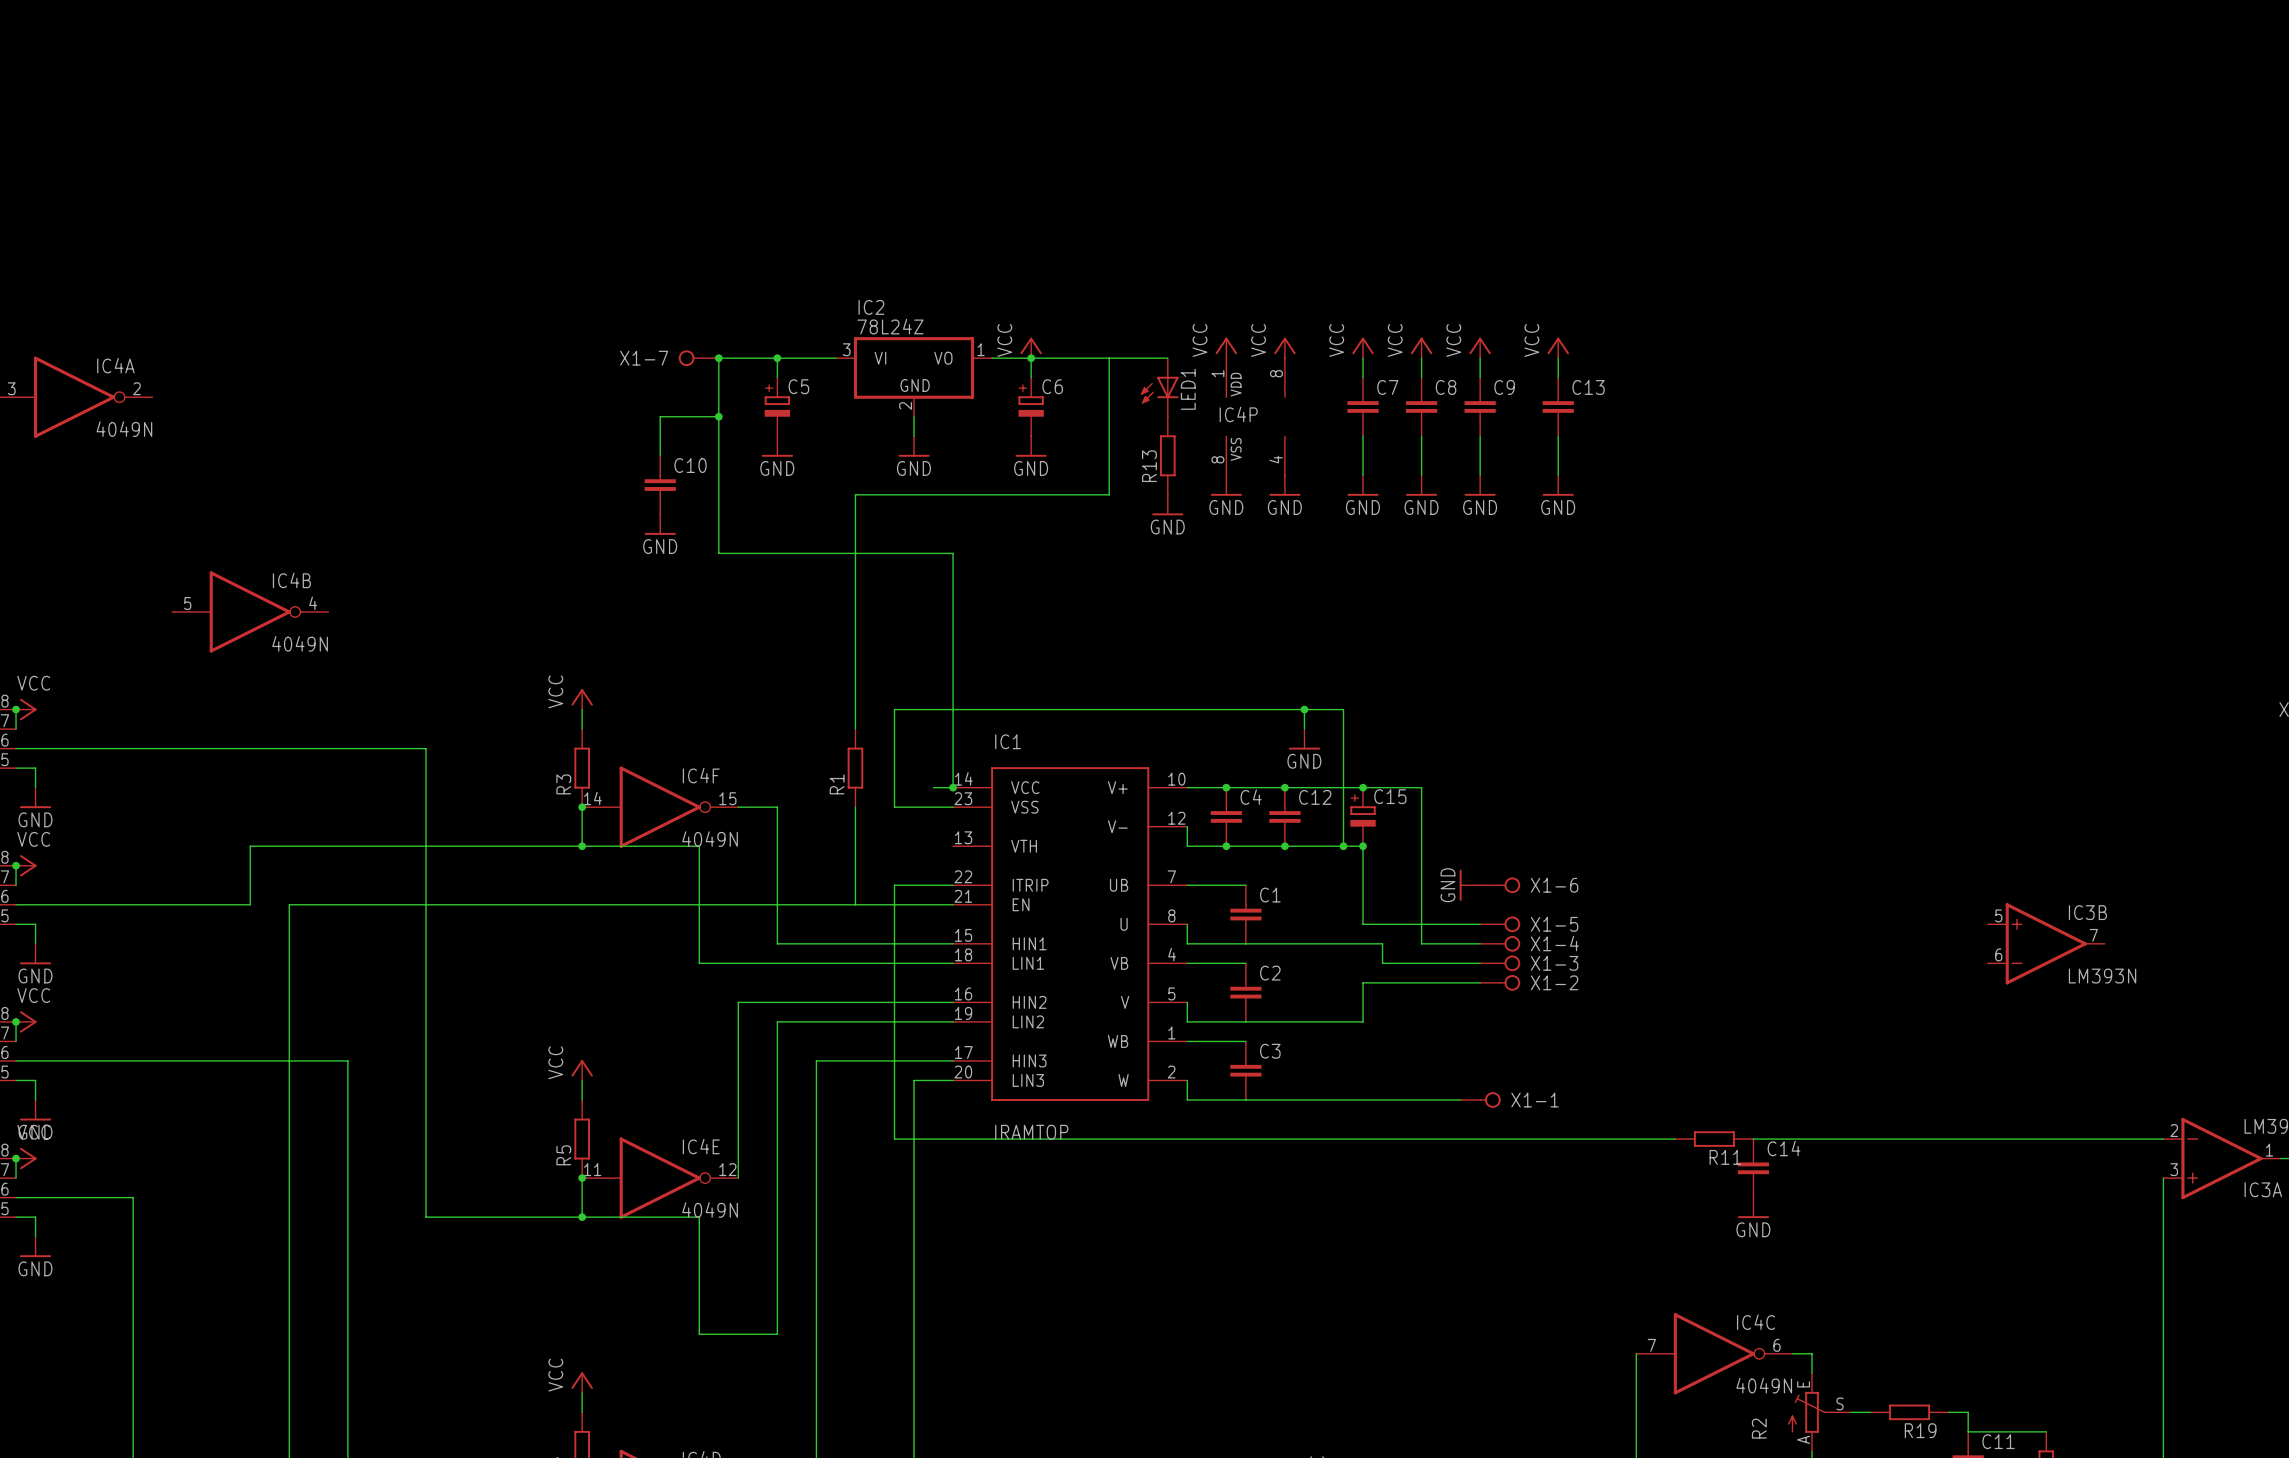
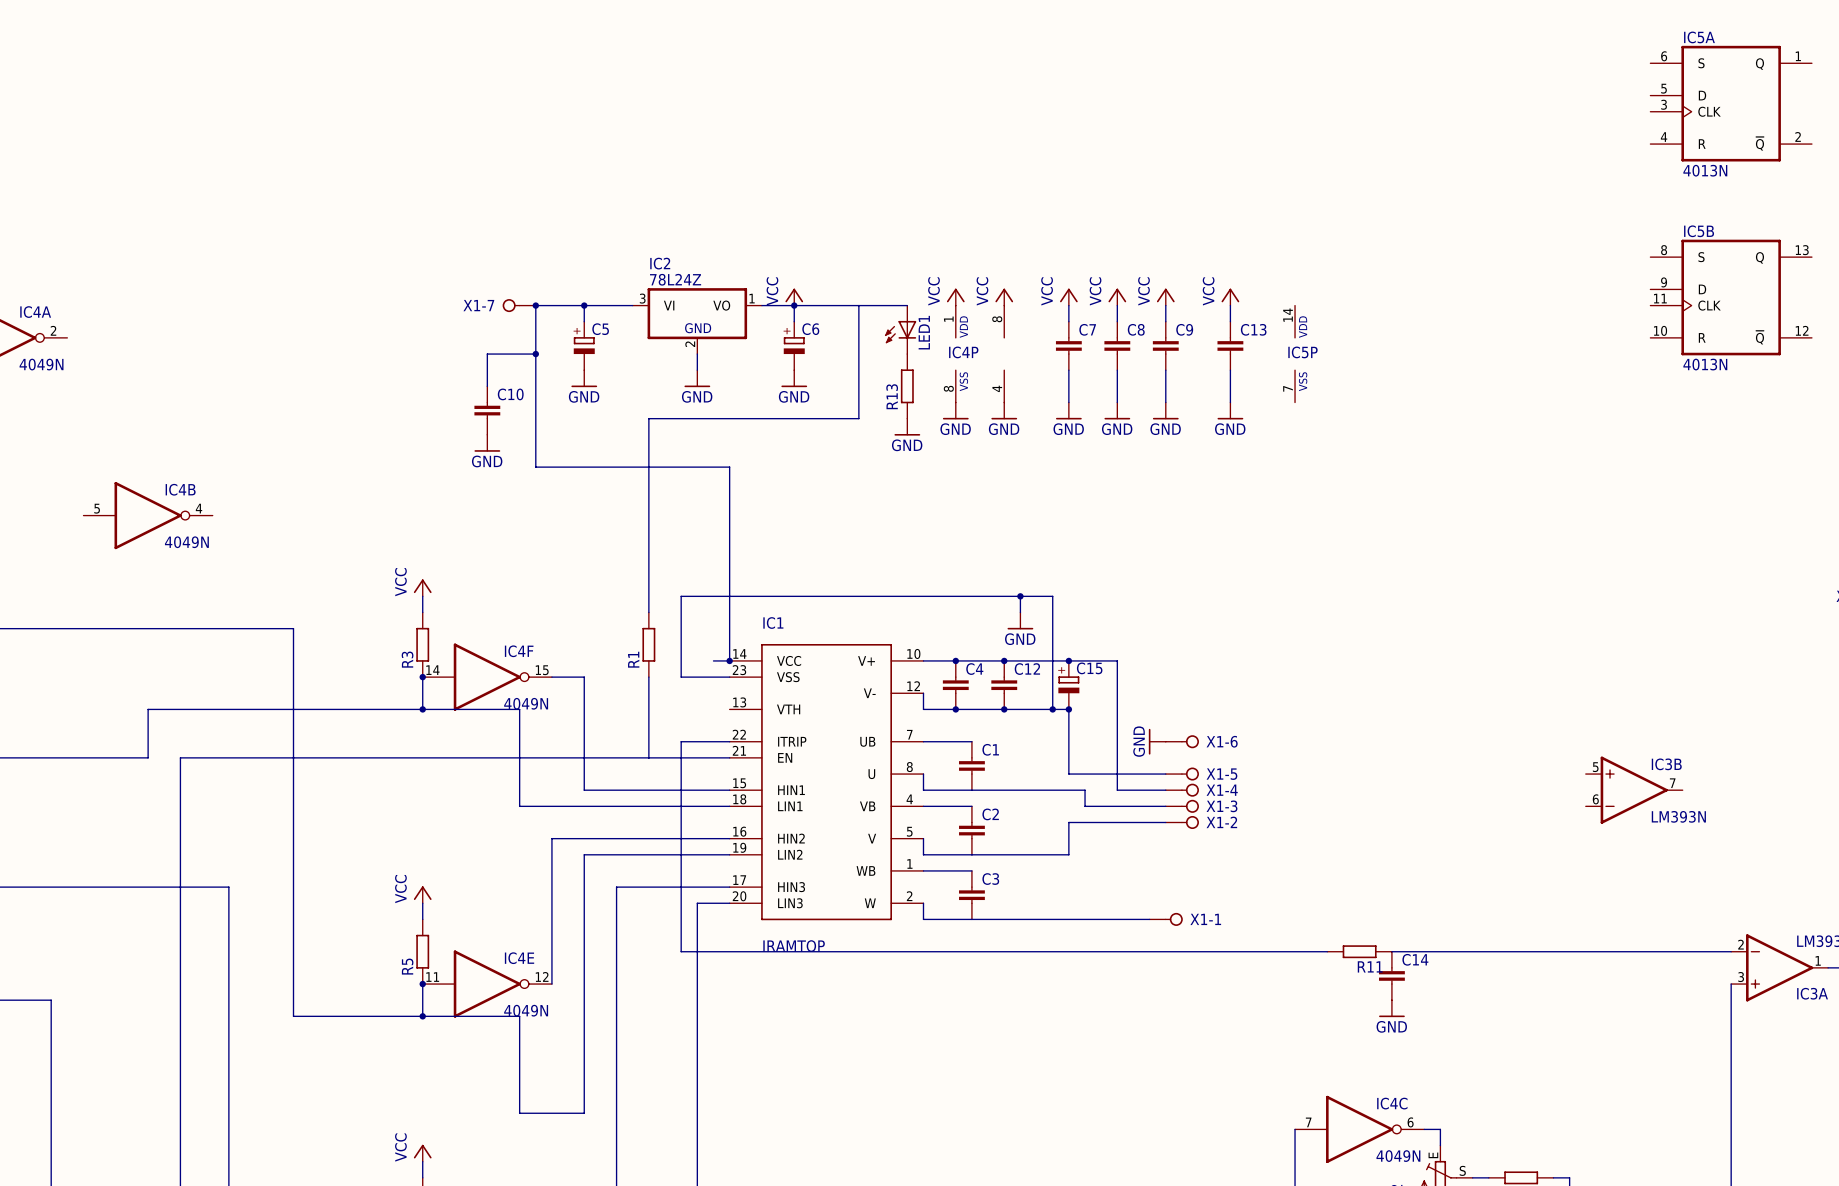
IC5A: none -> 4013N (1731, 103)
IC5B: none -> 4013N (1731, 297)
IC5P: none -> (1295, 354)

